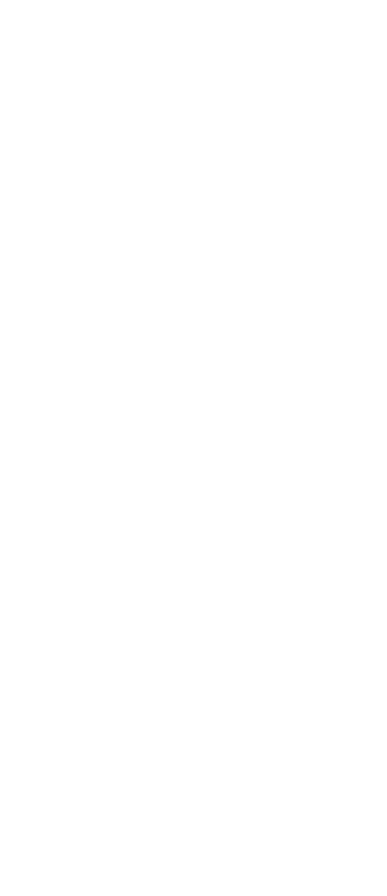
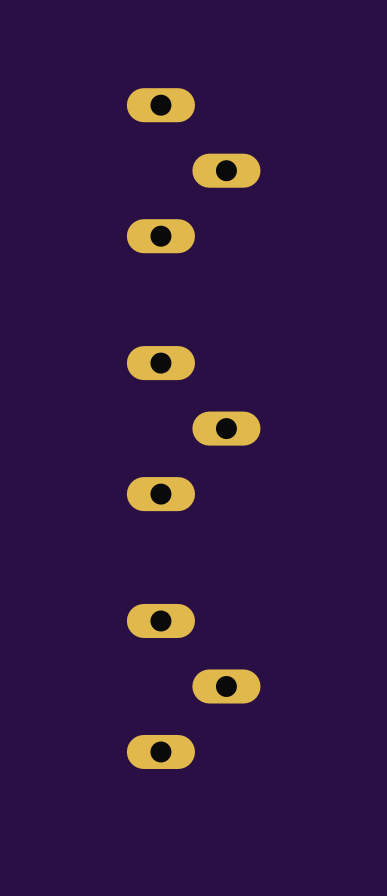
part: none -> (193, 170)
part: none -> (193, 428)
part: none -> (193, 686)

